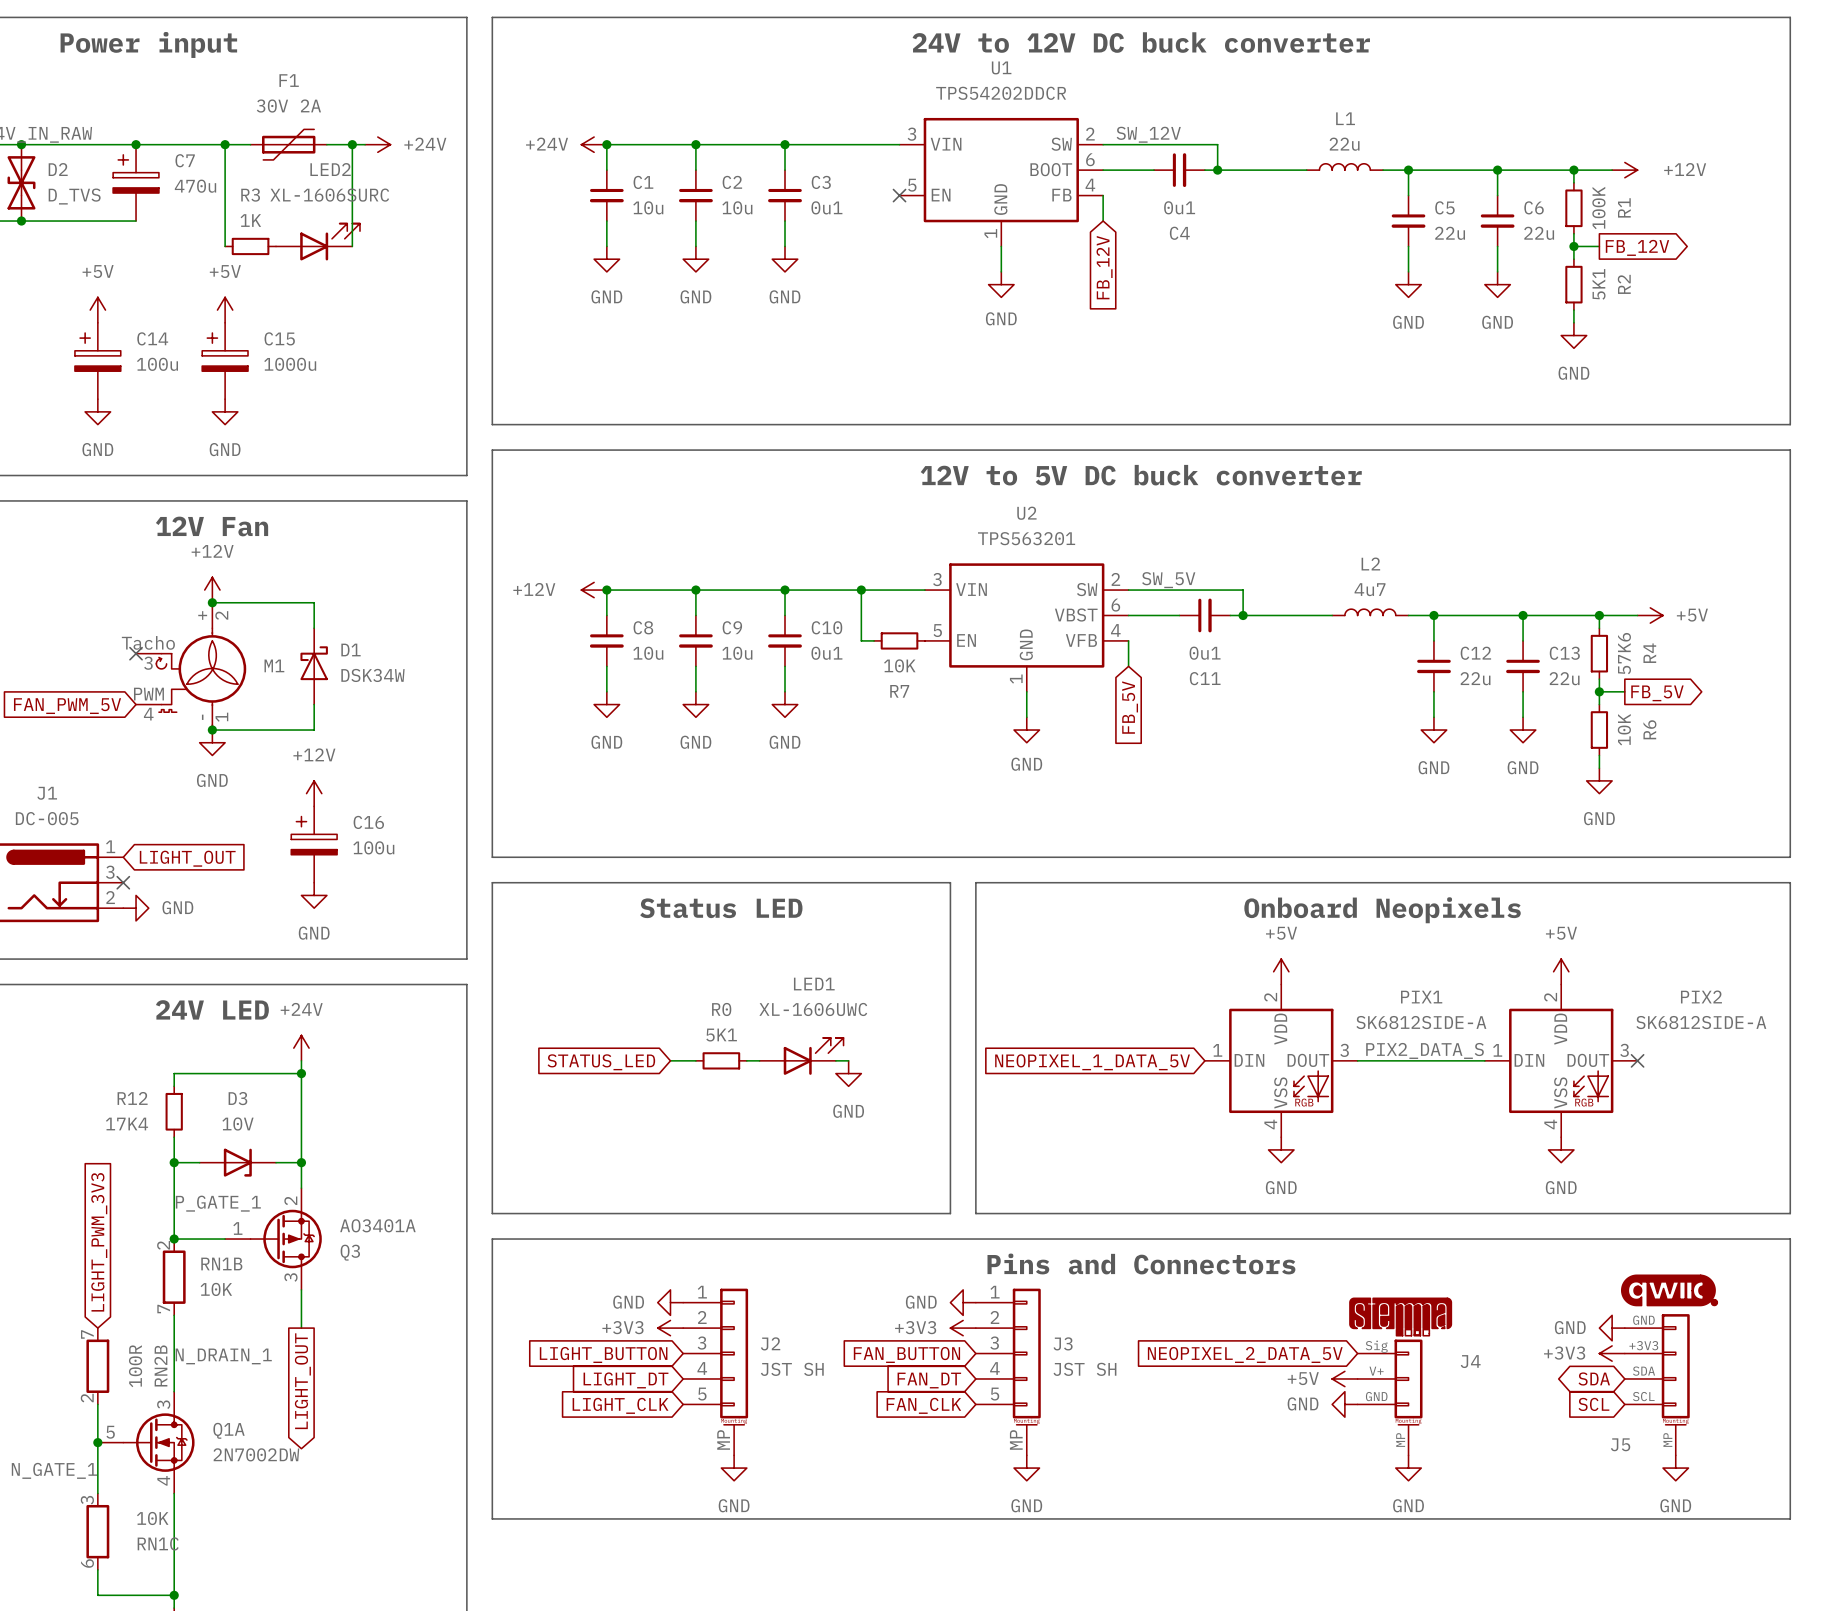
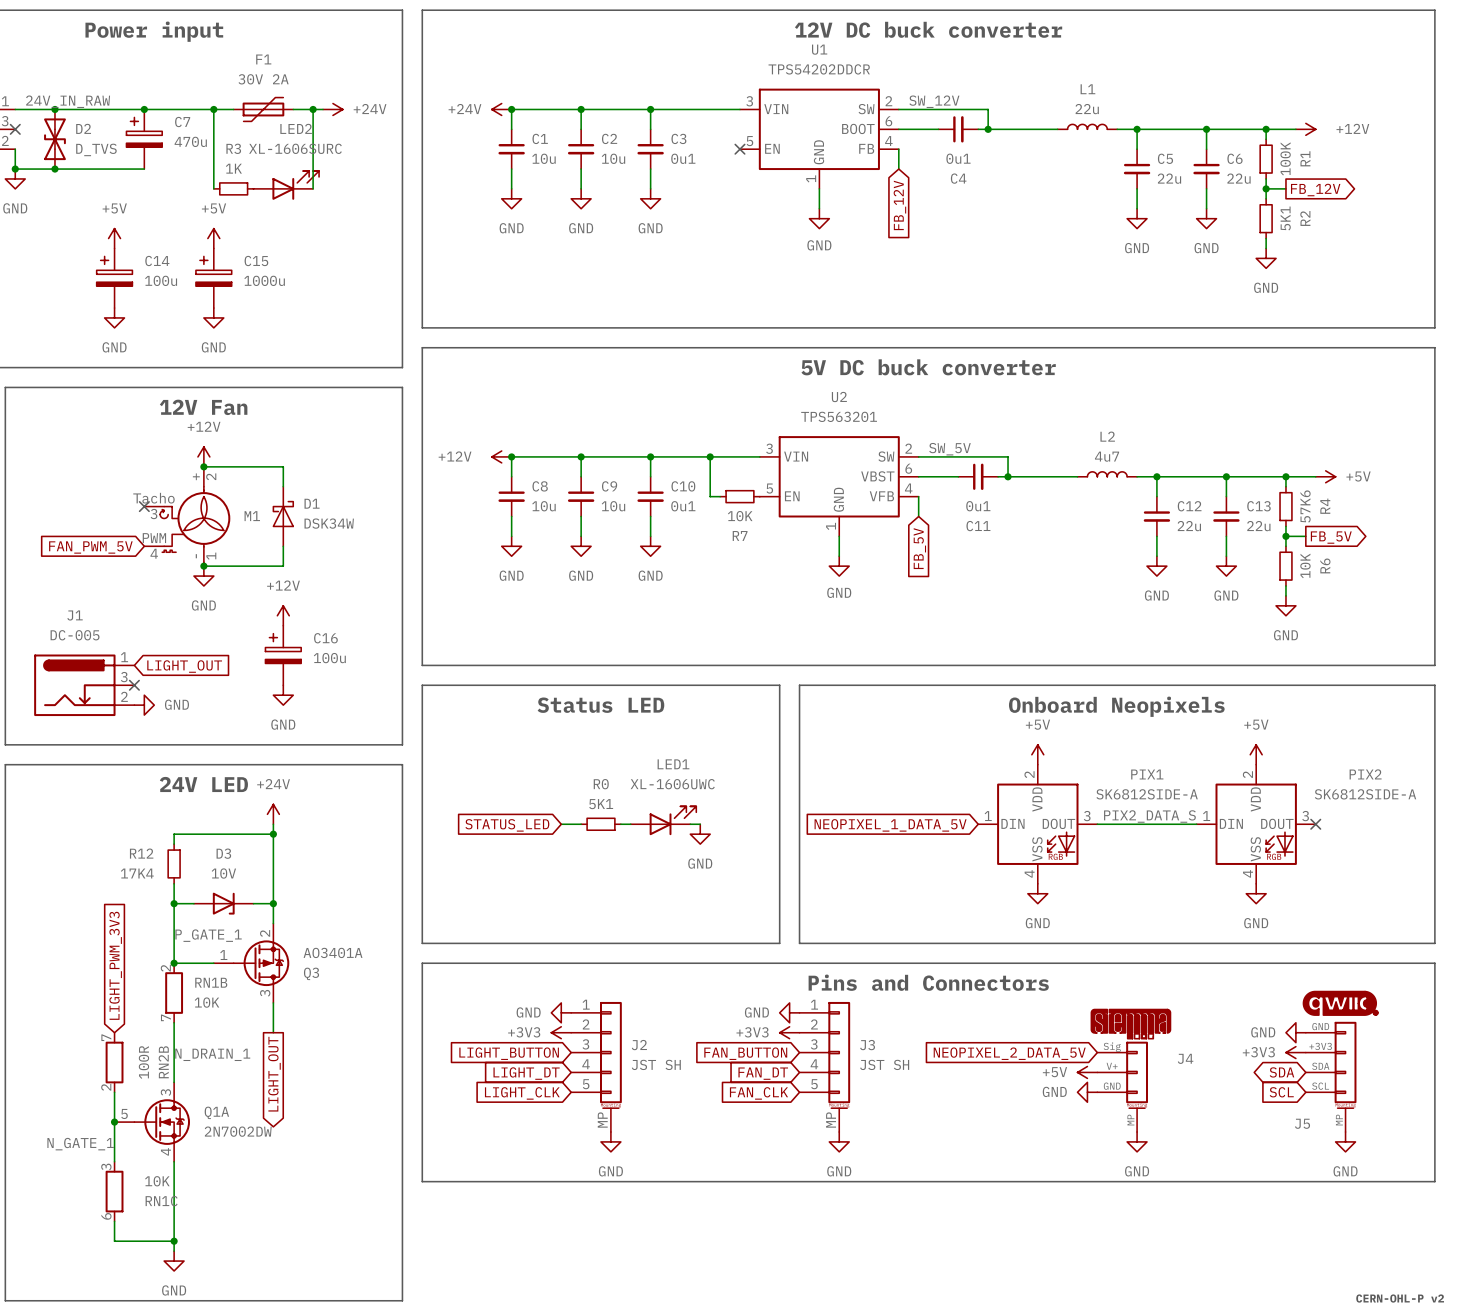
text: 24V to 12V DC buck converter (1141, 42) -> 12V DC buck converter (928, 29)
text: 12V to 5V DC buck converter (1141, 475) -> 5V DC buck converter (928, 367)

